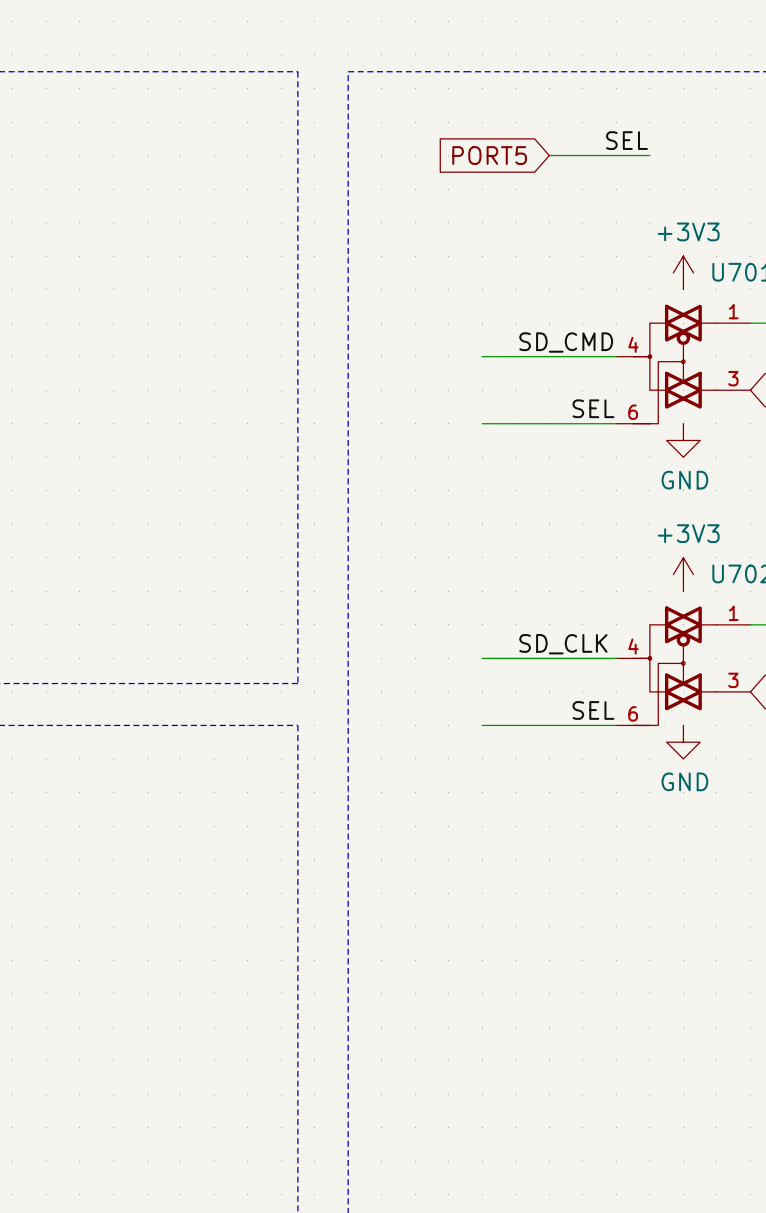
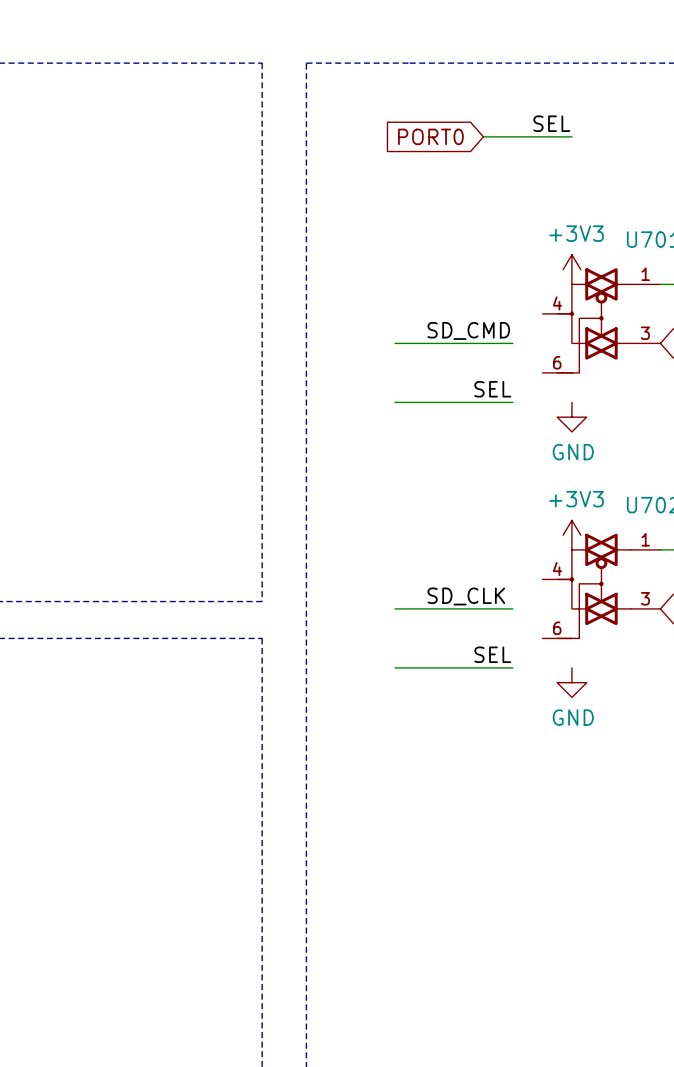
global label: PORT5 (489, 155) -> PORT0 (430, 136)
power symbol position: +3V3 (683, 272) -> +3V3 (571, 269)
label position: SD_CMD (566, 342) -> SD_CMD (468, 330)
wire: (482, 356) (616, 356) -> (394, 343) (512, 343)
label position: SEL (593, 408) -> SEL (492, 389)
wire: (482, 423) (616, 423) -> (394, 402) (512, 402)
power symbol position: GND (683, 440) -> GND (571, 417)
power symbol position: +3V3 (683, 574) -> +3V3 (571, 535)
label position: SD_CLK (563, 644) -> SD_CLK (466, 596)
wire: (482, 658) (616, 658) -> (394, 608) (512, 608)
label position: SEL (593, 710) -> SEL (492, 654)
wire: (482, 725) (616, 725) -> (394, 667) (512, 667)
power symbol position: GND (683, 742) -> GND (571, 682)

